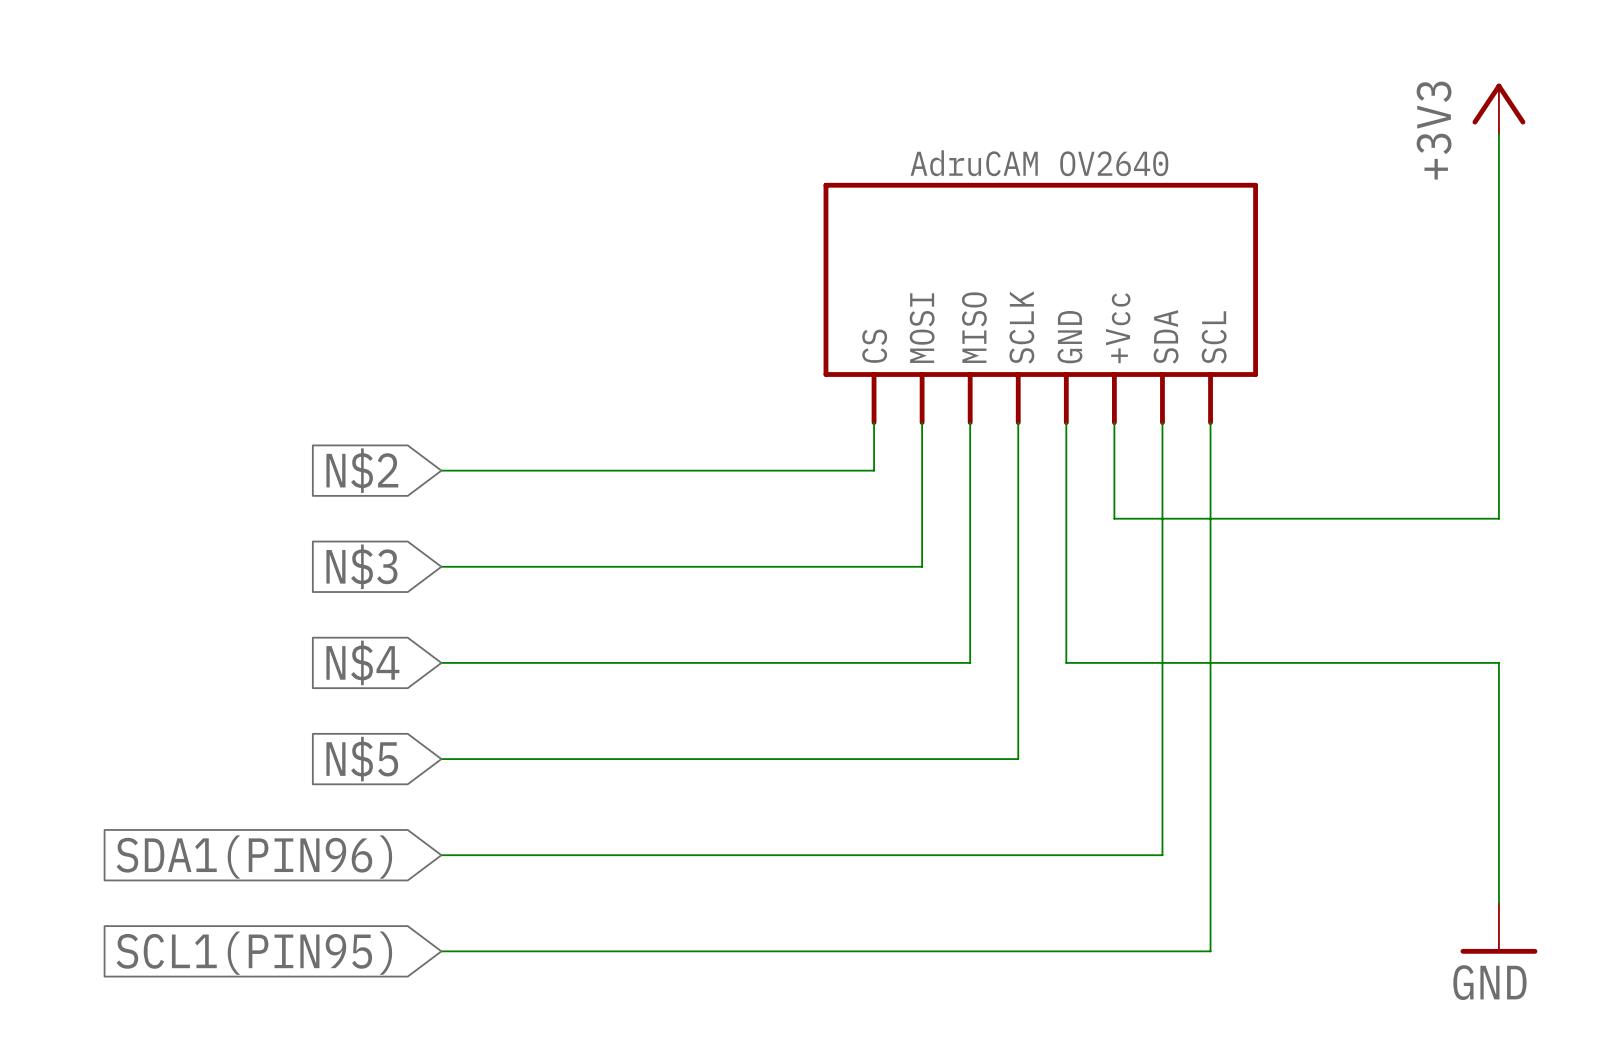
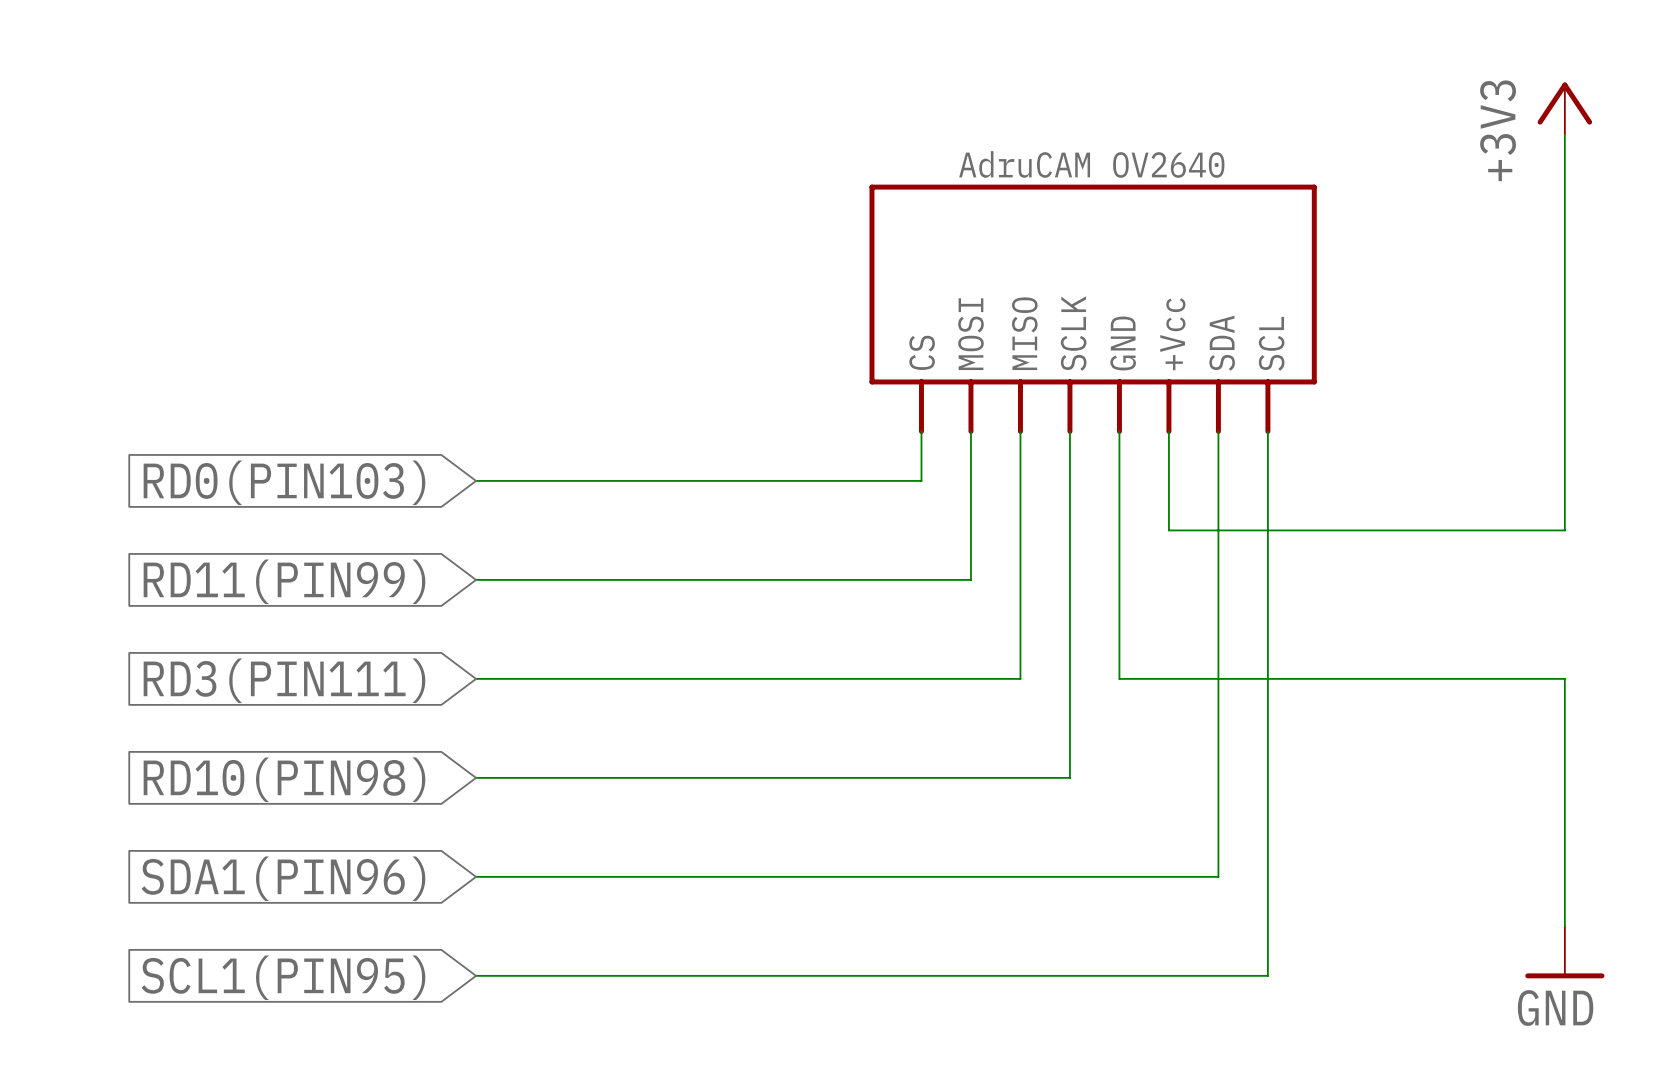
global label: N$2 (362, 470) -> RD0(PIN103) (284, 482)
global label: N$3 (361, 566) -> RD11(PIN99) (284, 581)
global label: N$4 (362, 662) -> RD3(PIN111) (284, 680)
global label: N$5 (362, 759) -> RD10(PIN98) (284, 779)

